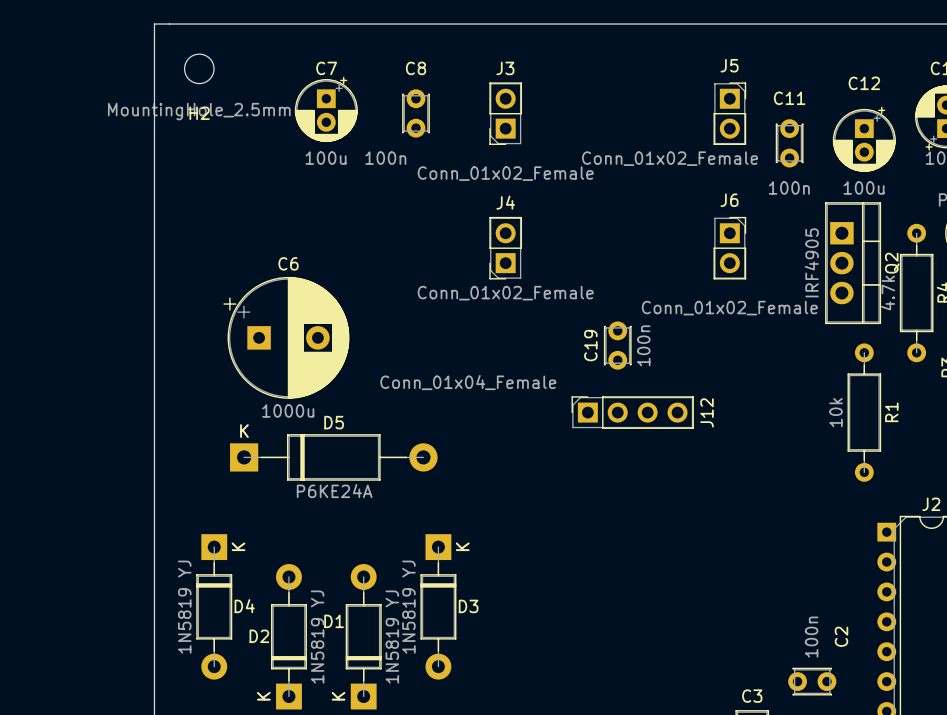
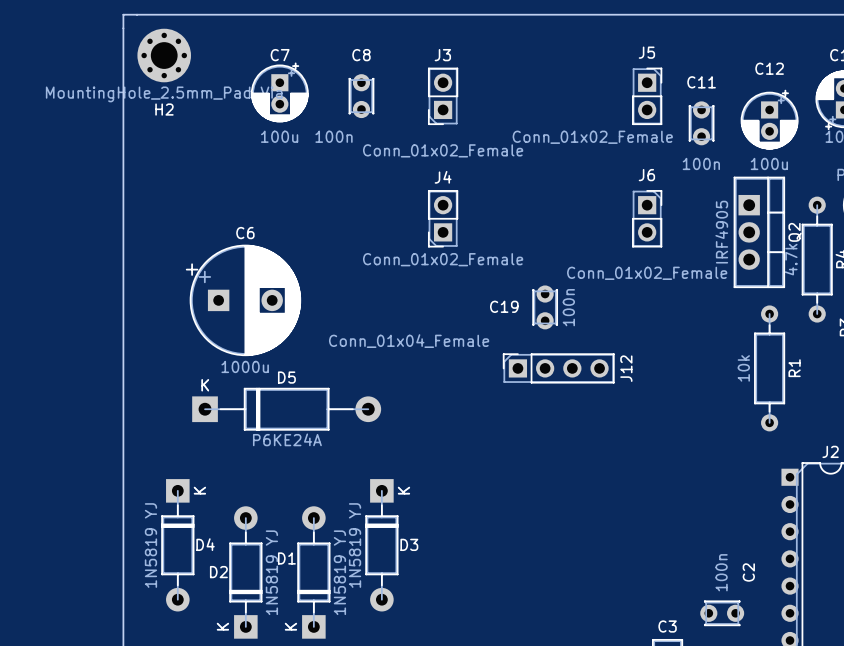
H2 footprint: [184, 54, 215, 84] -> [137, 28, 191, 83]
H2 value: MountingHole_2.5mm (199, 111) -> MountingHole_2.5mm_Pad_Via (164, 94)
C19 name rotation: 0° (590, 345) -> 90° clockwise (504, 306)

